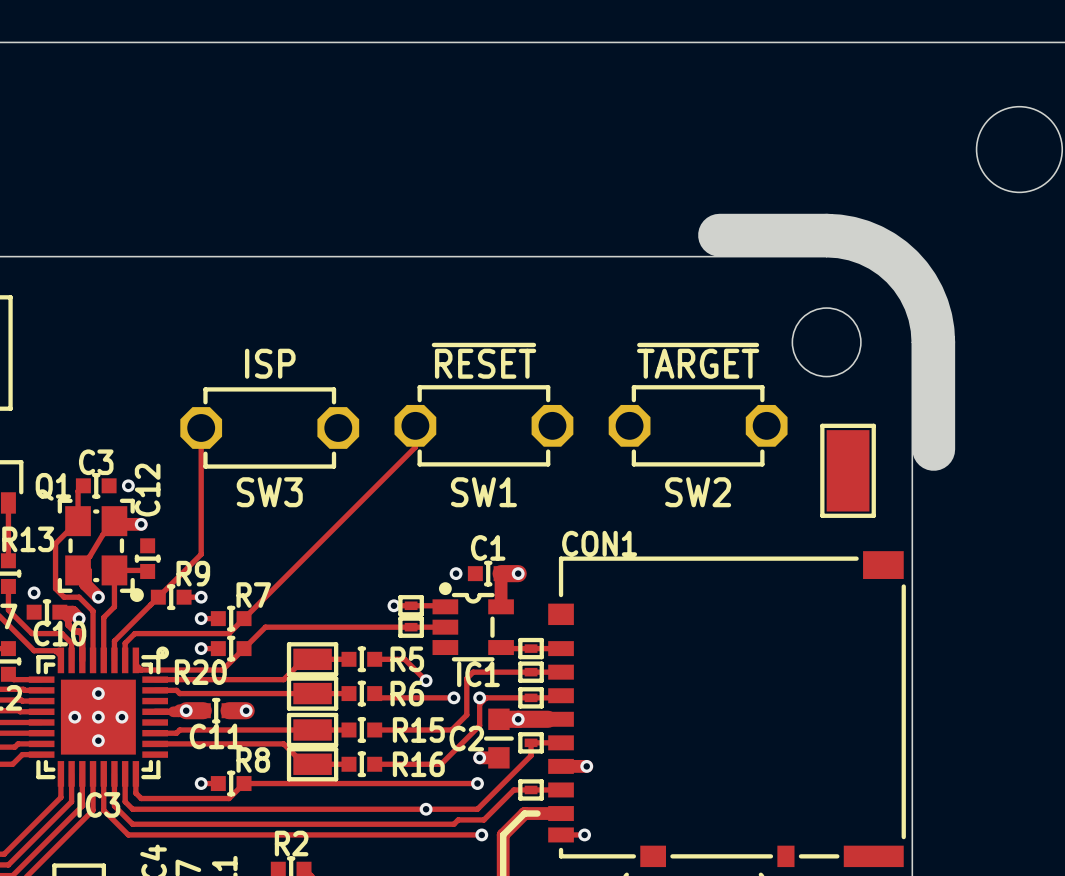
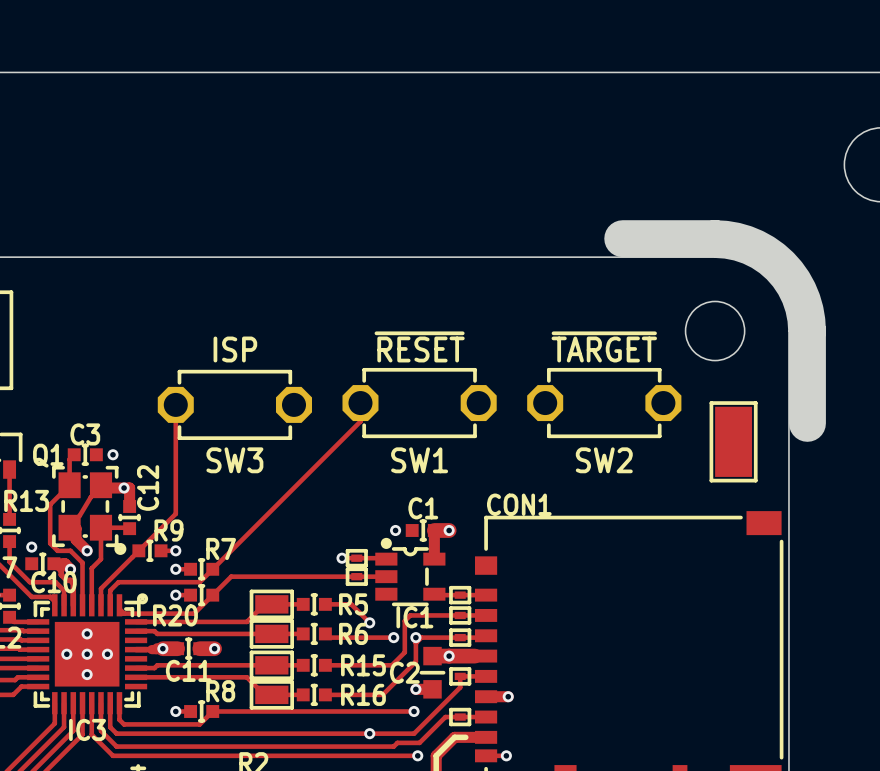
C12 name position: C12 (147, 490) -> C12 (148, 488)
track: none -> (124, 488) (129, 488) (129, 506)

